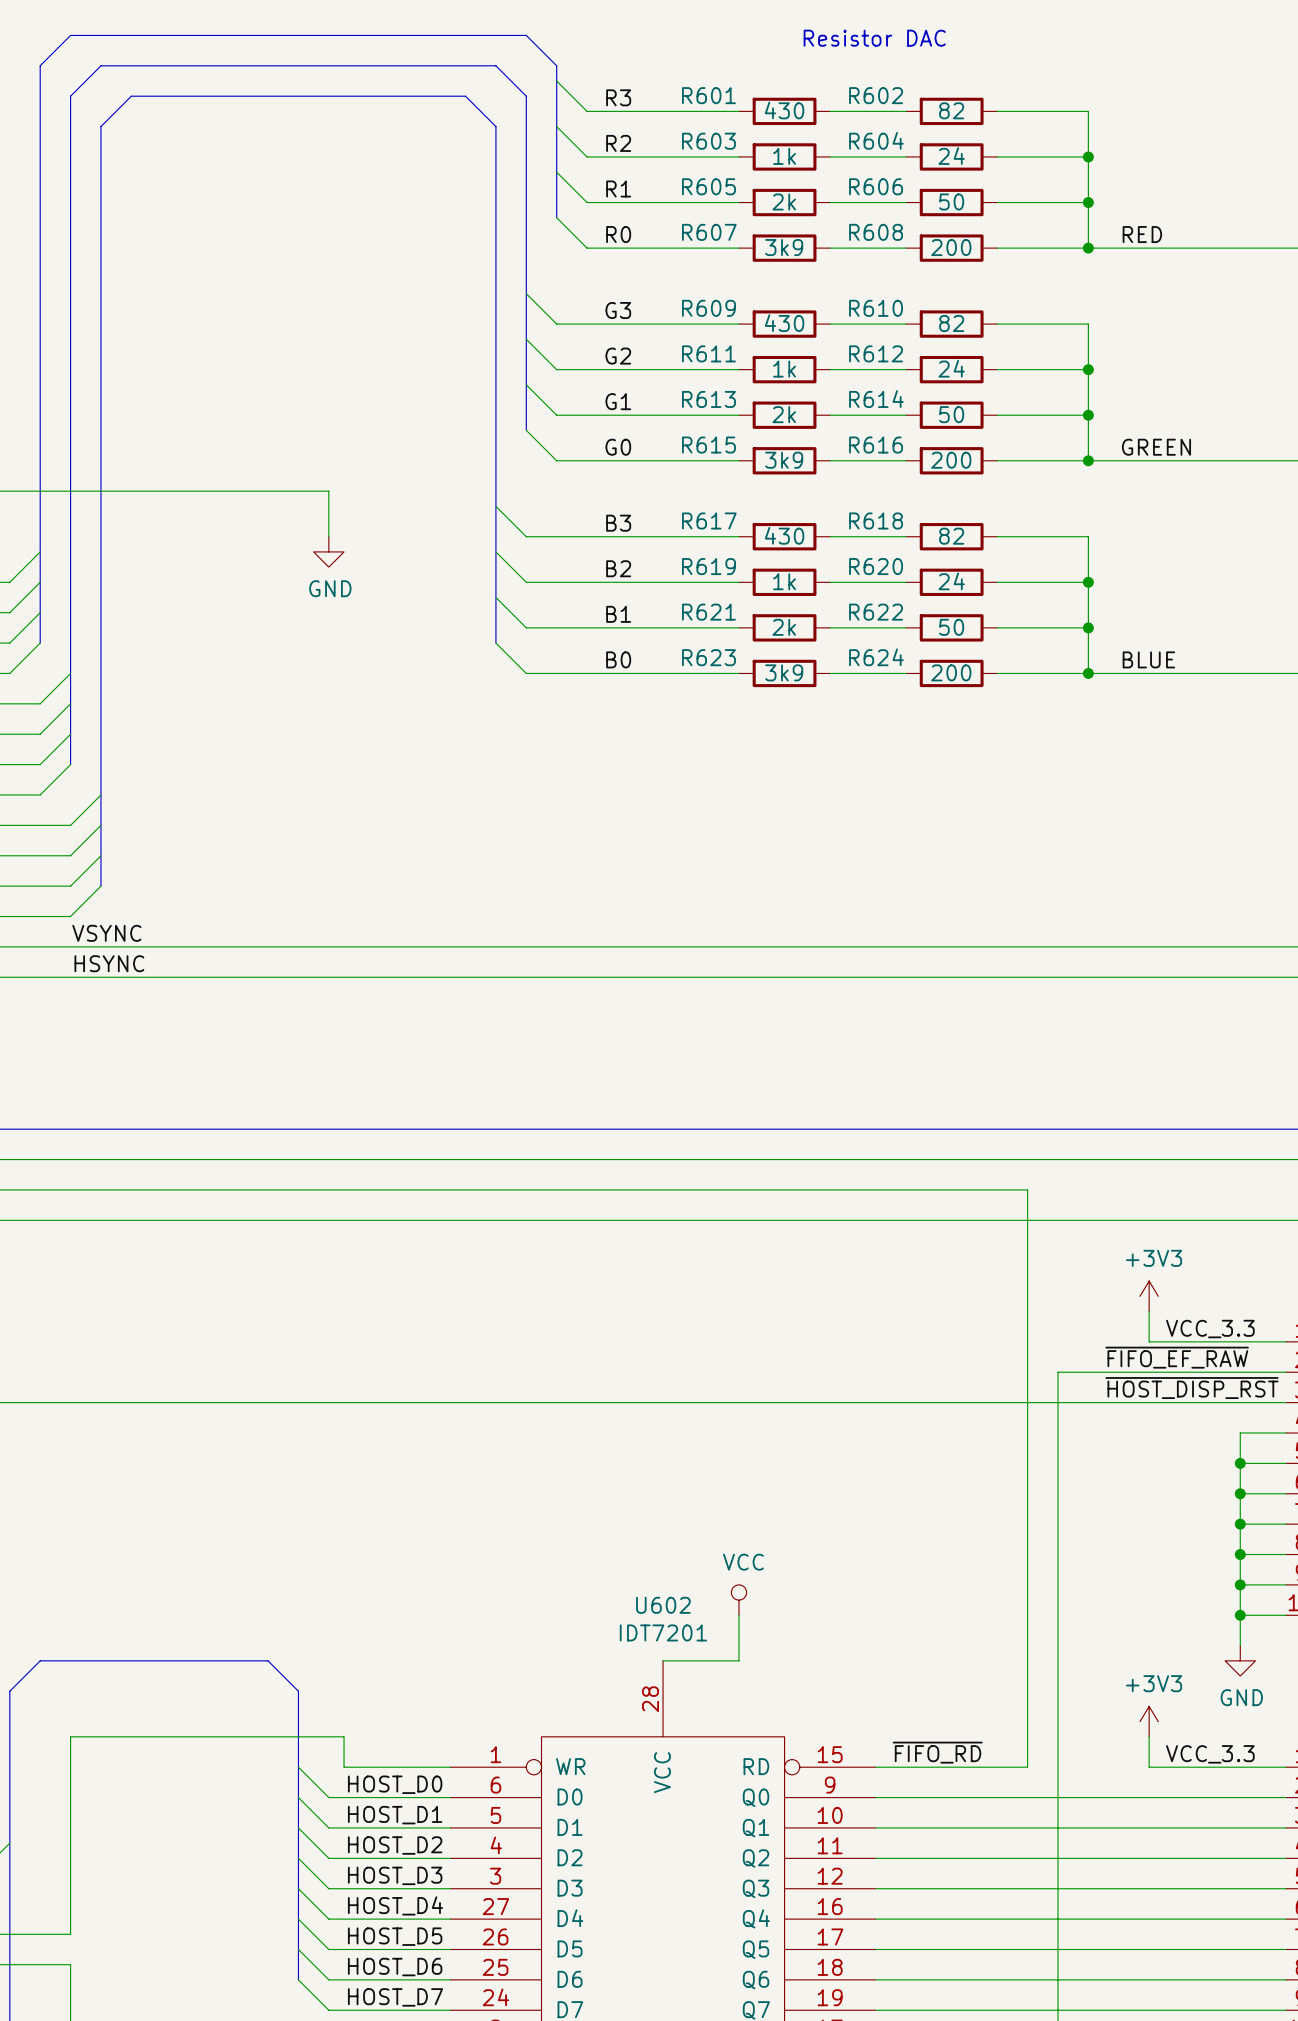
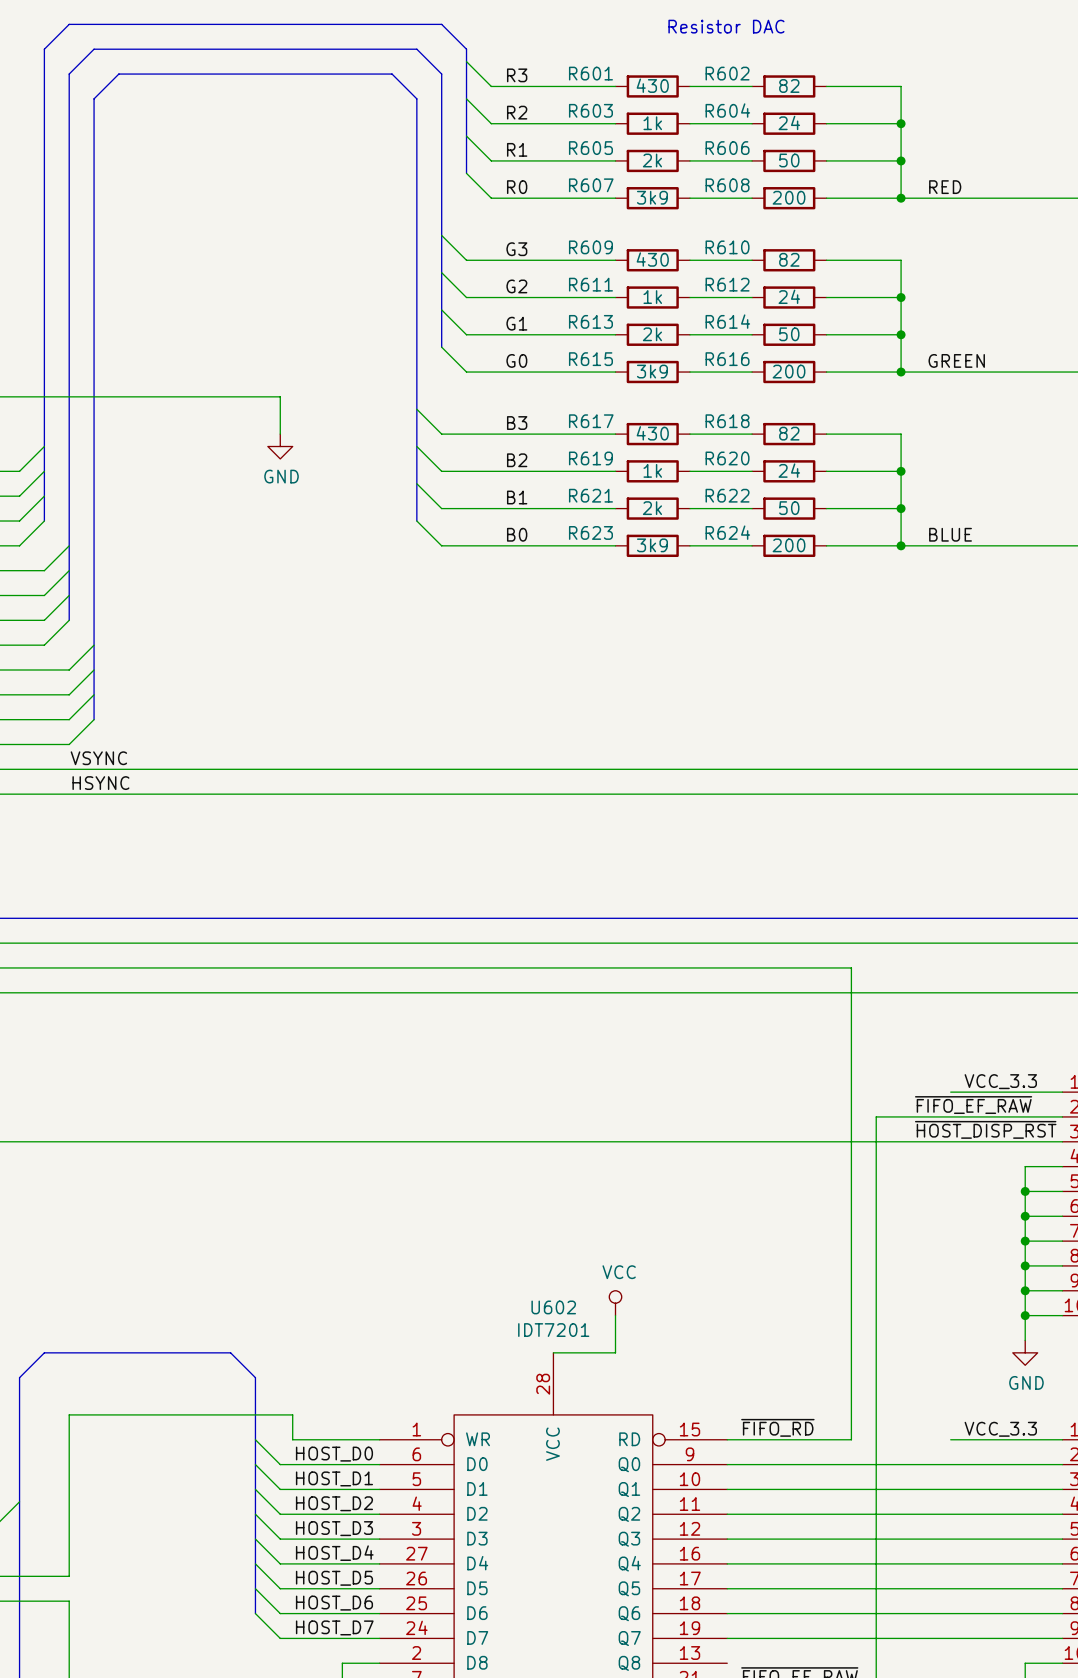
power symbol: +3V3 (1149, 1296) -> none
wire: (1149, 1311) (1149, 1341) -> none
power symbol: +3V3 (1149, 1721) -> none
wire: (1149, 1736) (1149, 1767) -> none

